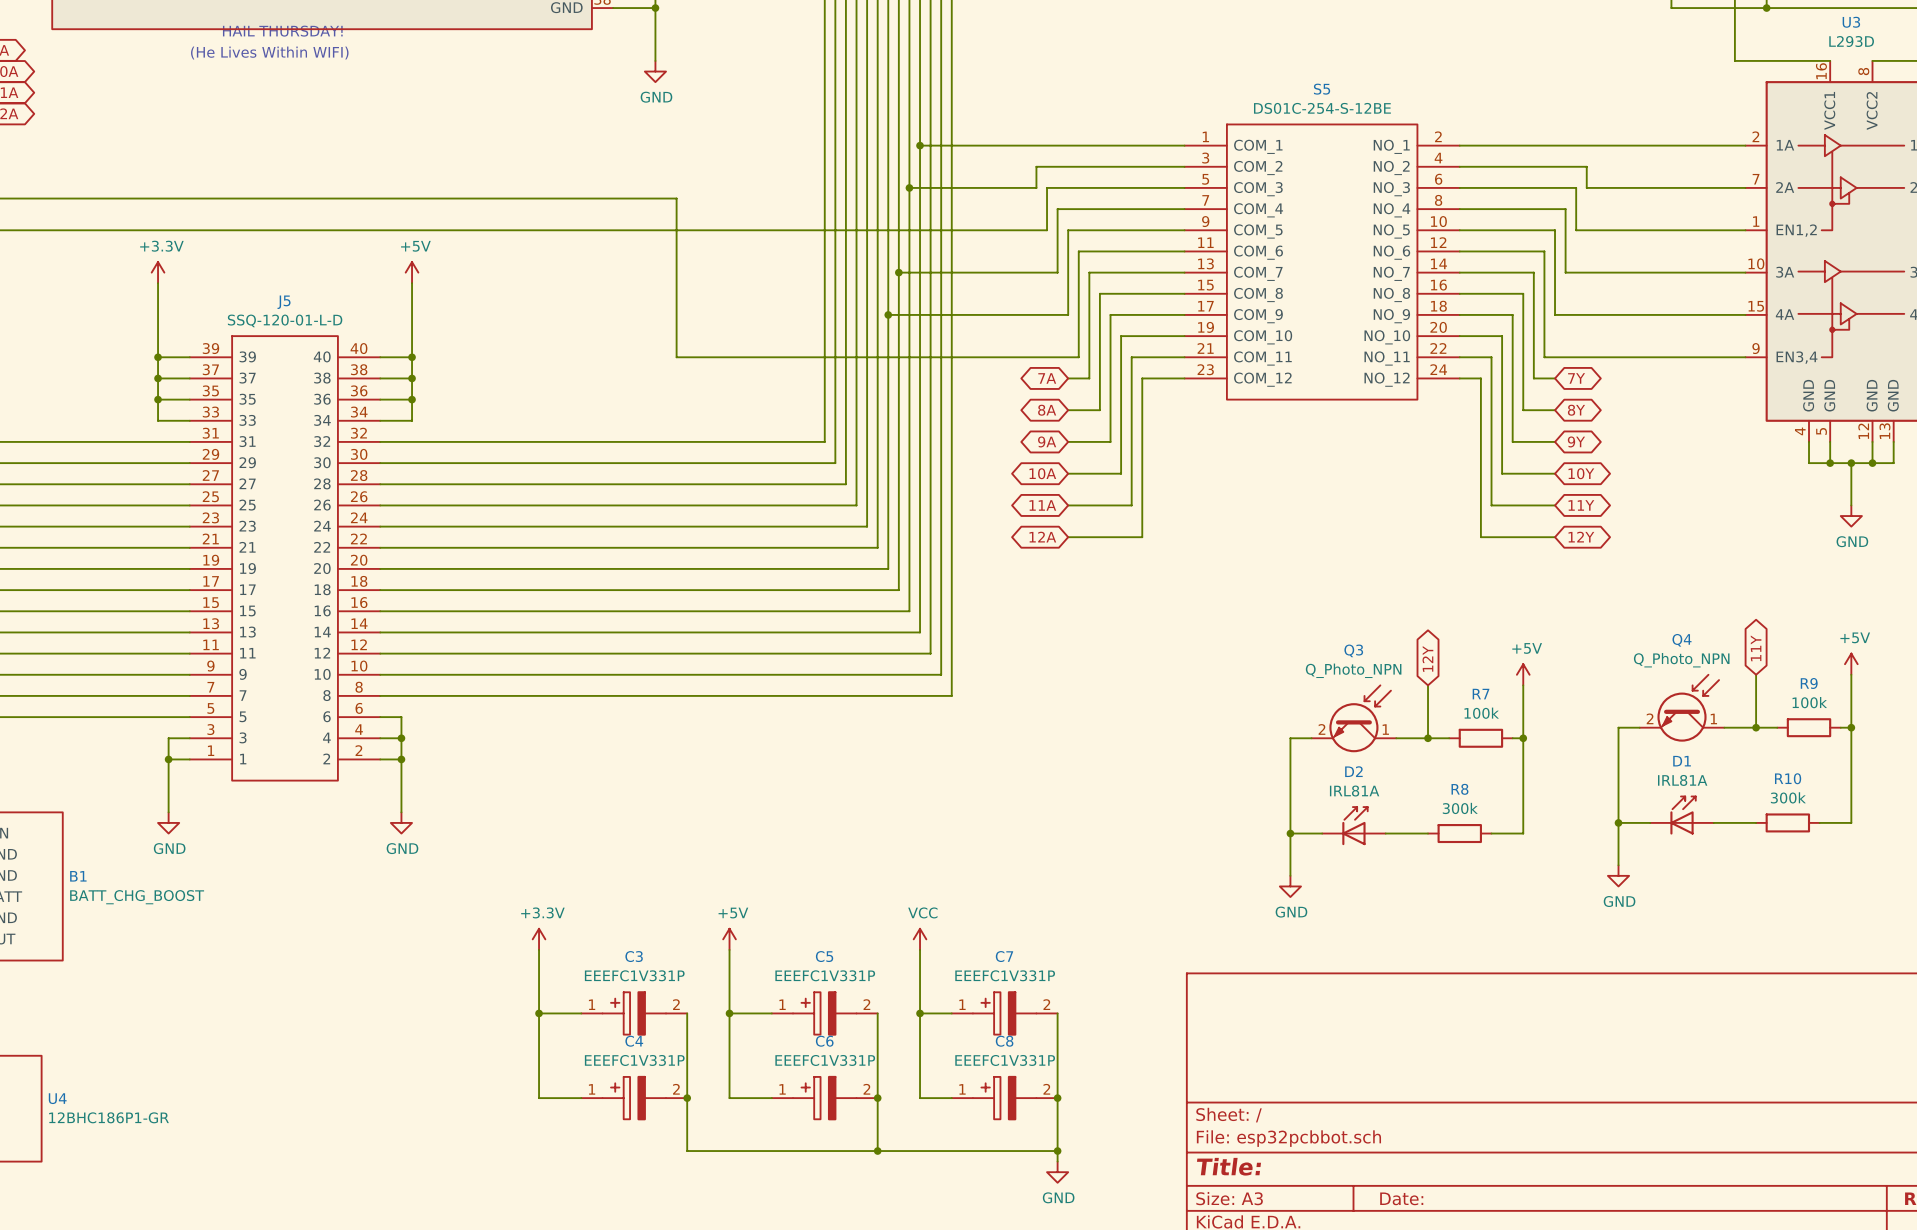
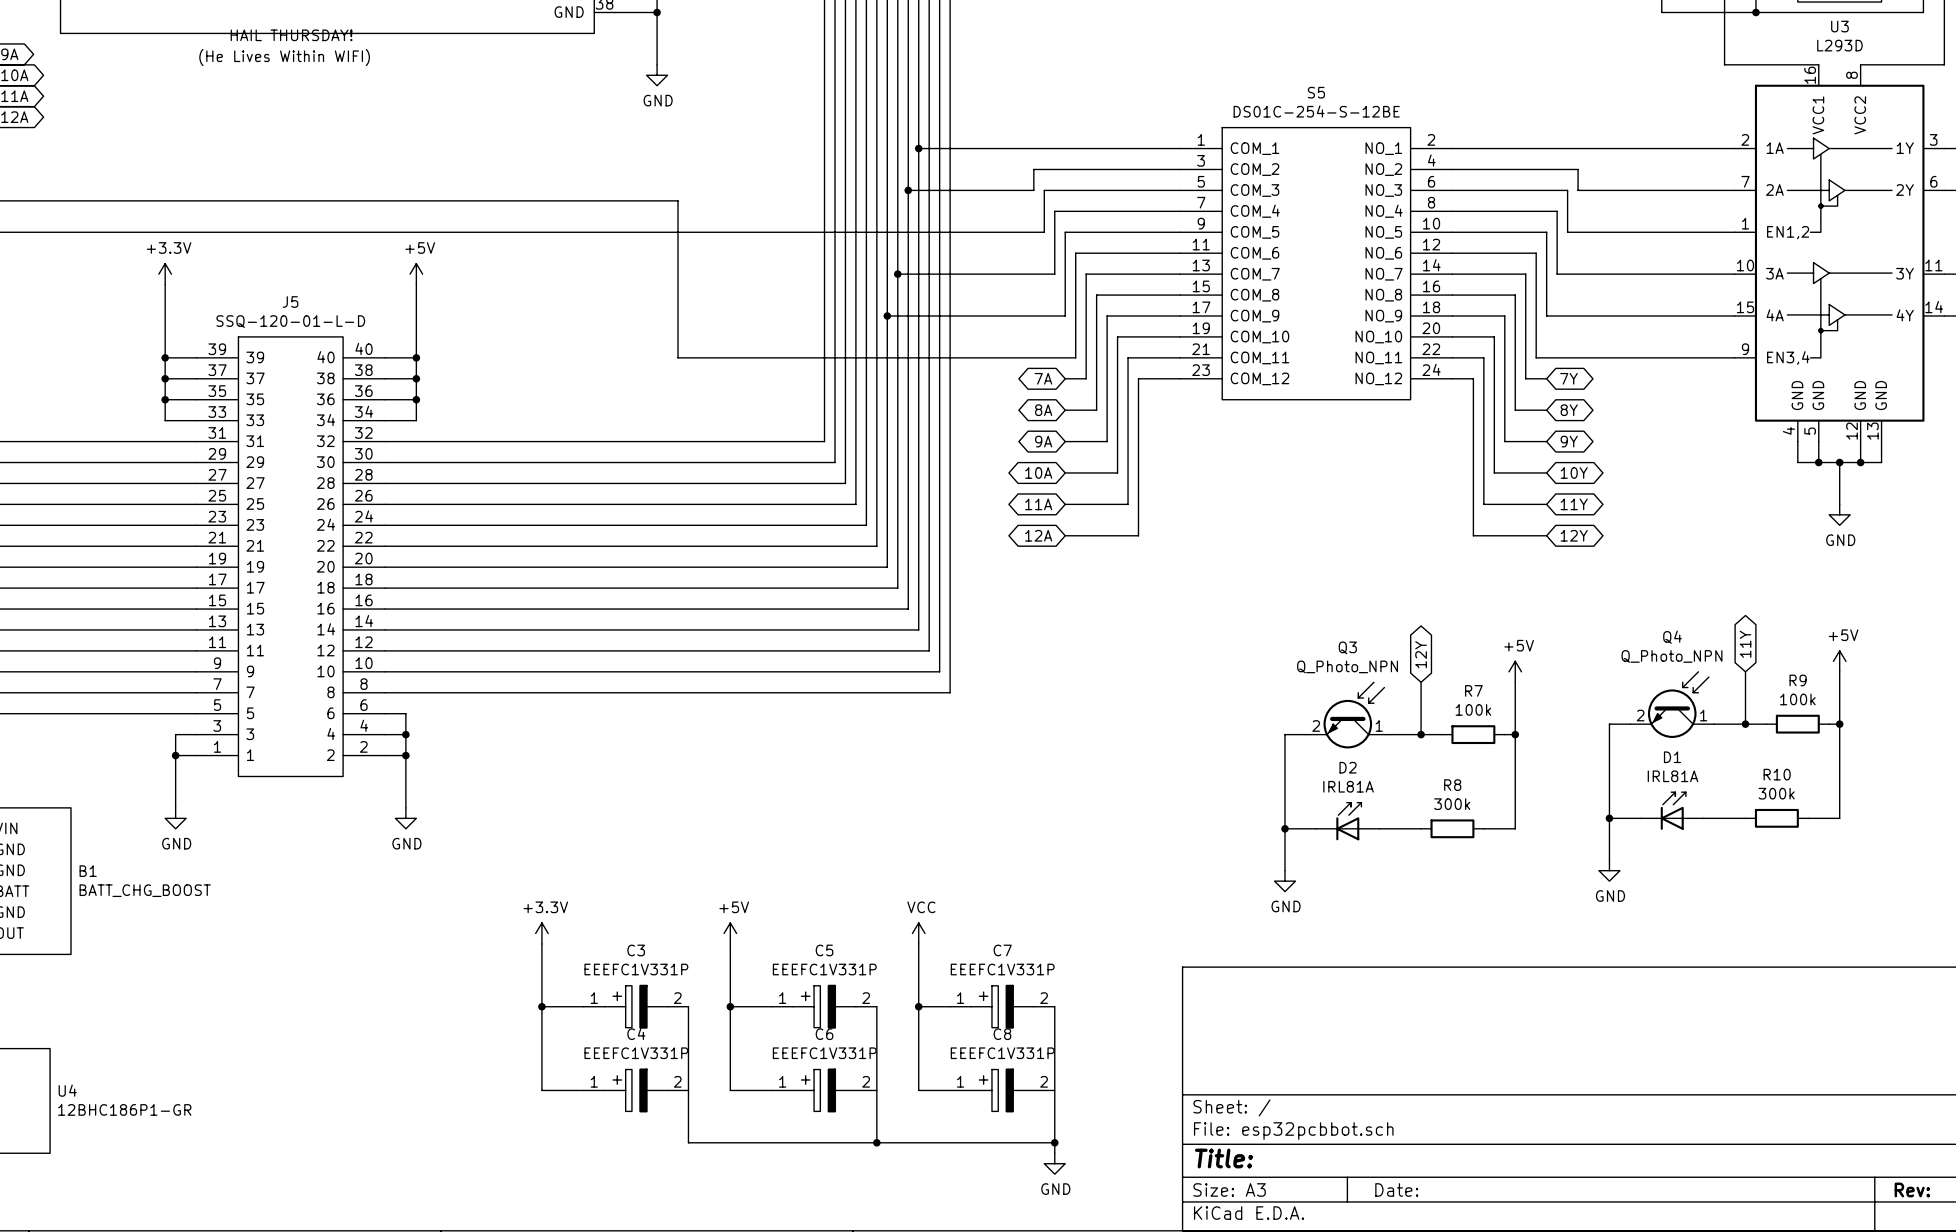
junction: (687, 1098) -> none
junction: (877, 1098) -> none
junction: (1057, 1098) -> none

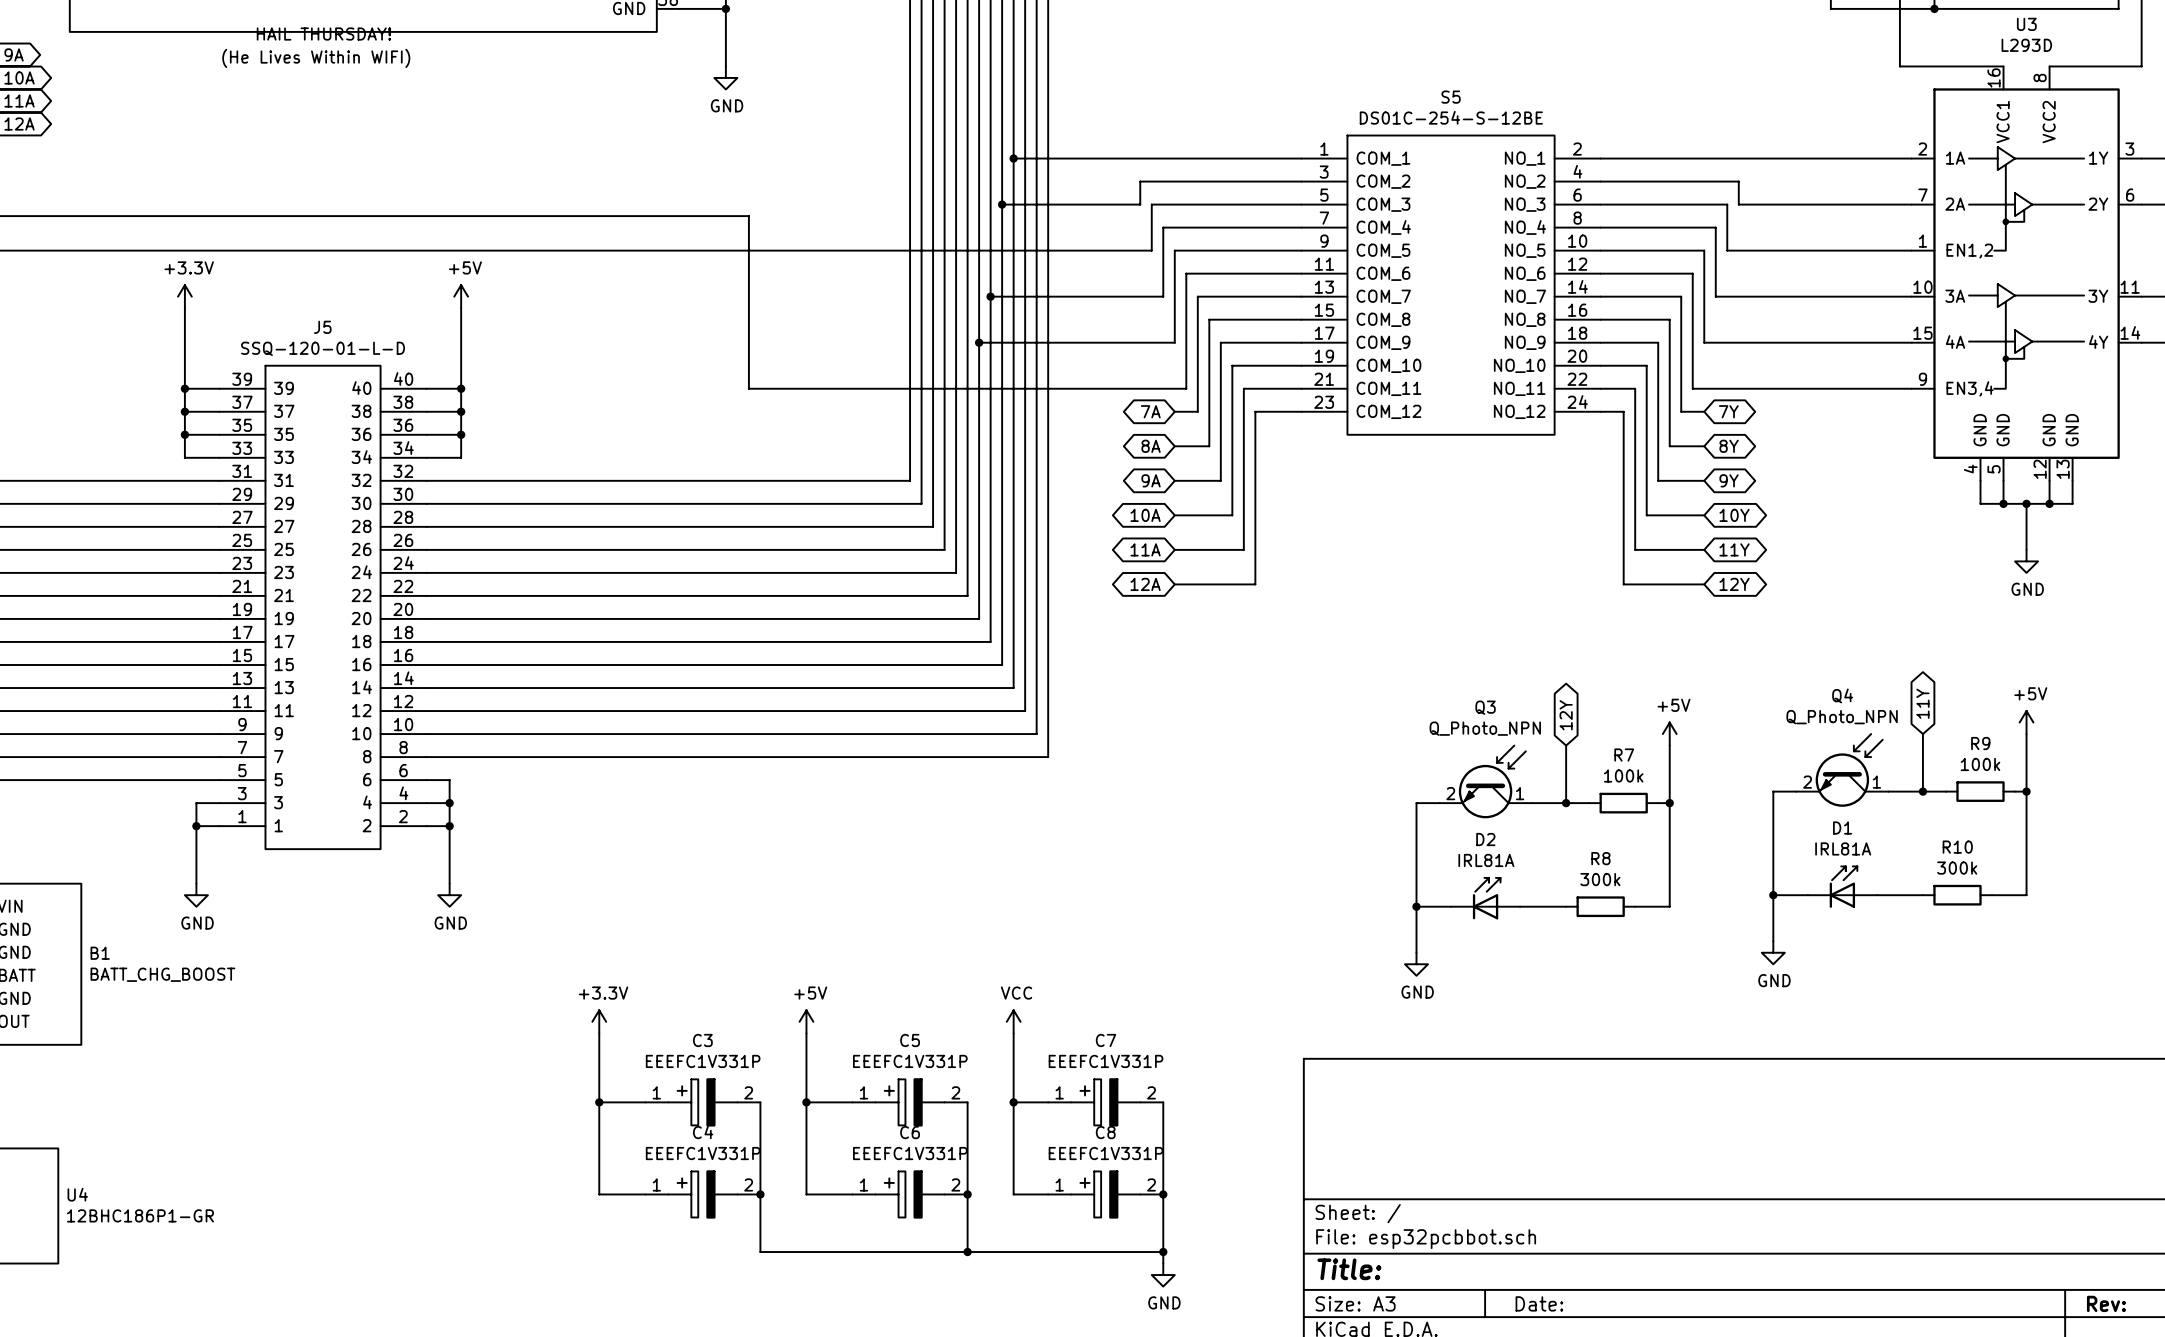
junction: none -> (760, 1194)
junction: none -> (967, 1194)
junction: none -> (1163, 1194)

